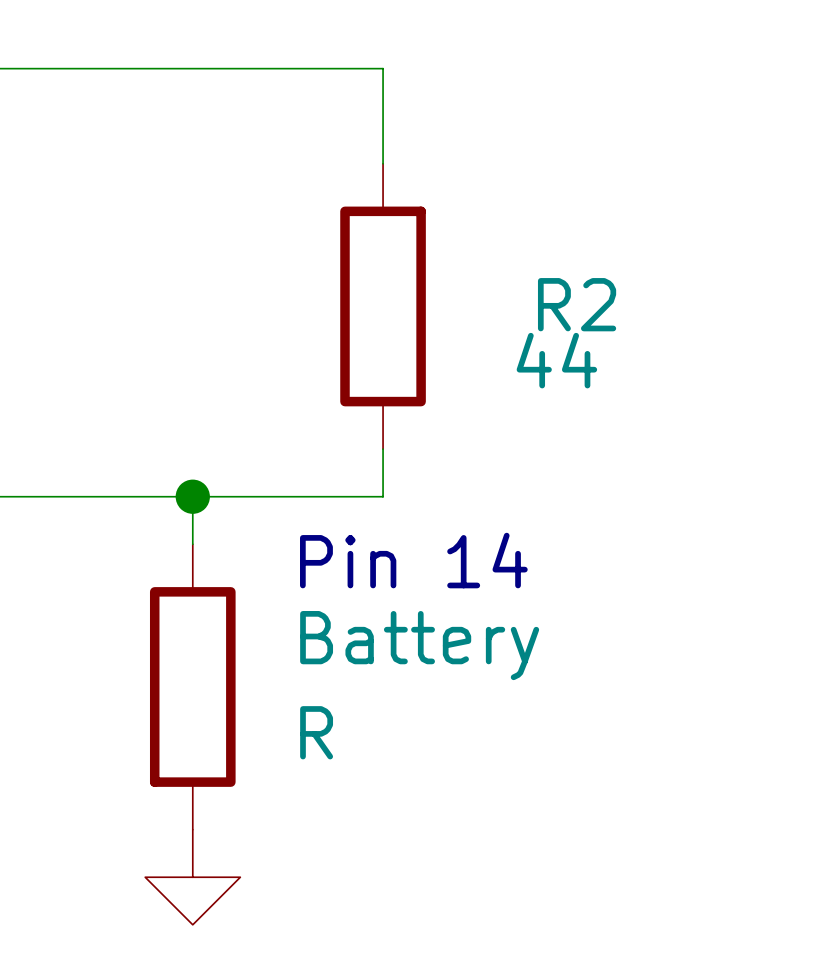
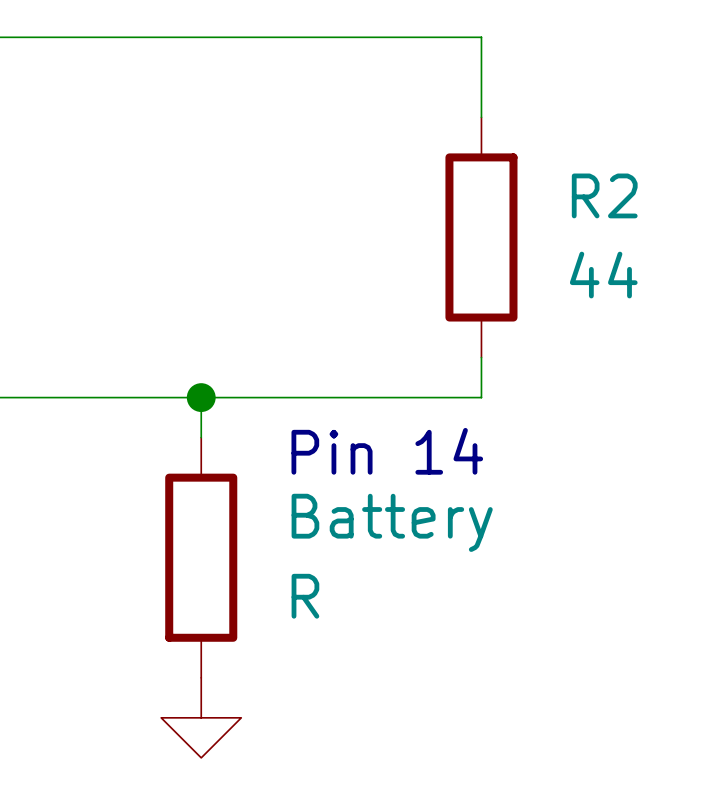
wire: (383, 68) (383, 163) -> (361, 37) (481, 37) (481, 117)
R2 name position: R2 (577, 304) -> R2 (604, 195)
R2 position: (383, 306) -> (481, 237)
R2 value position: 44 (556, 360) -> 44 (603, 275)
wire: (383, 449) (383, 496) -> (481, 357) (481, 397) (361, 397)

